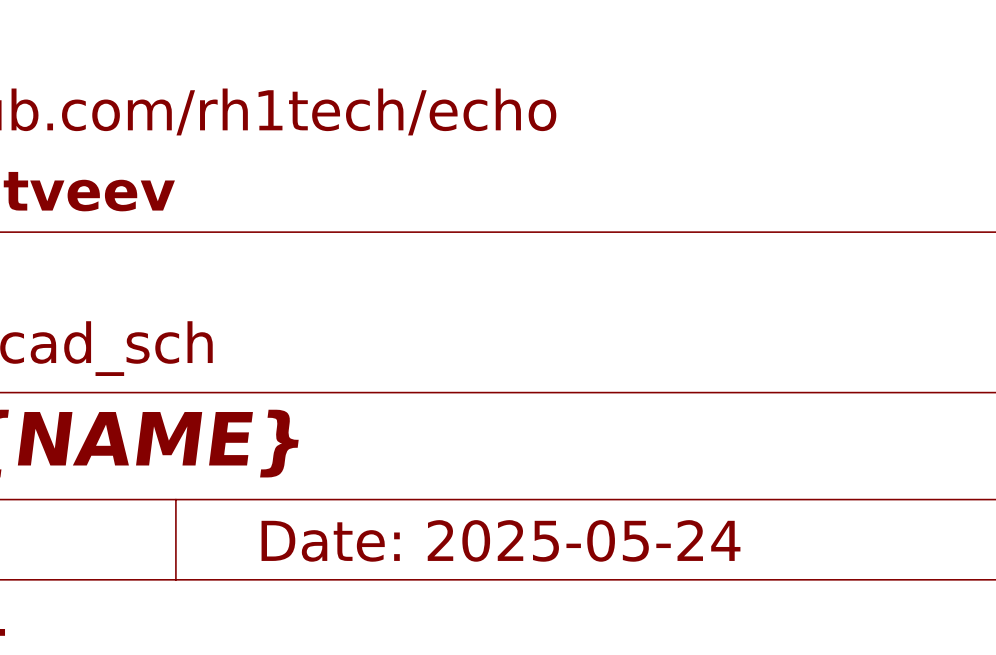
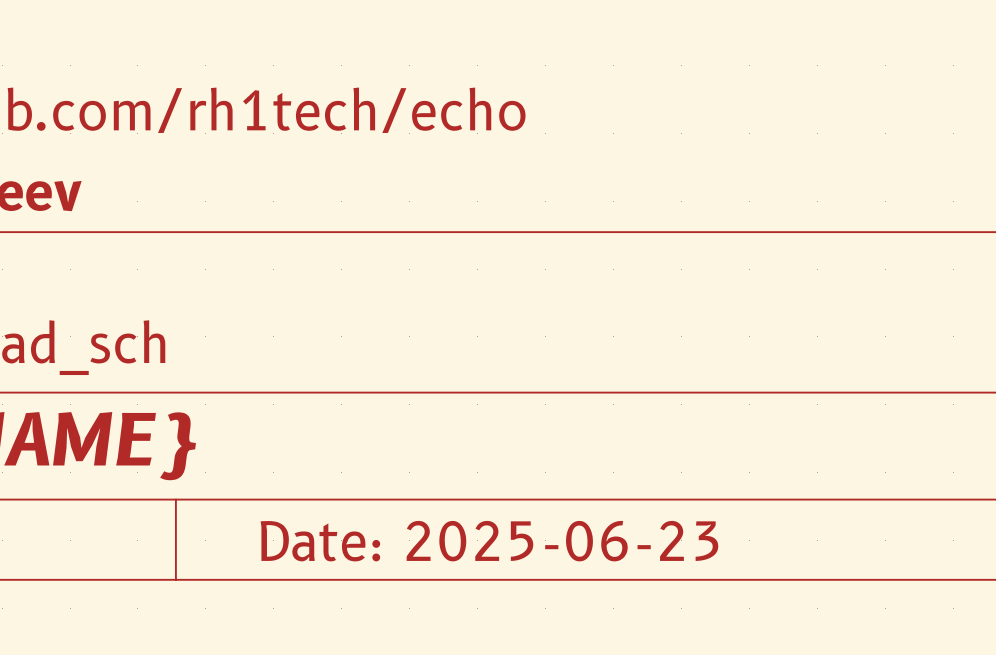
title block: Date: 2025-05-24 (500, 540) -> Date: 2025-06-23 (489, 541)

